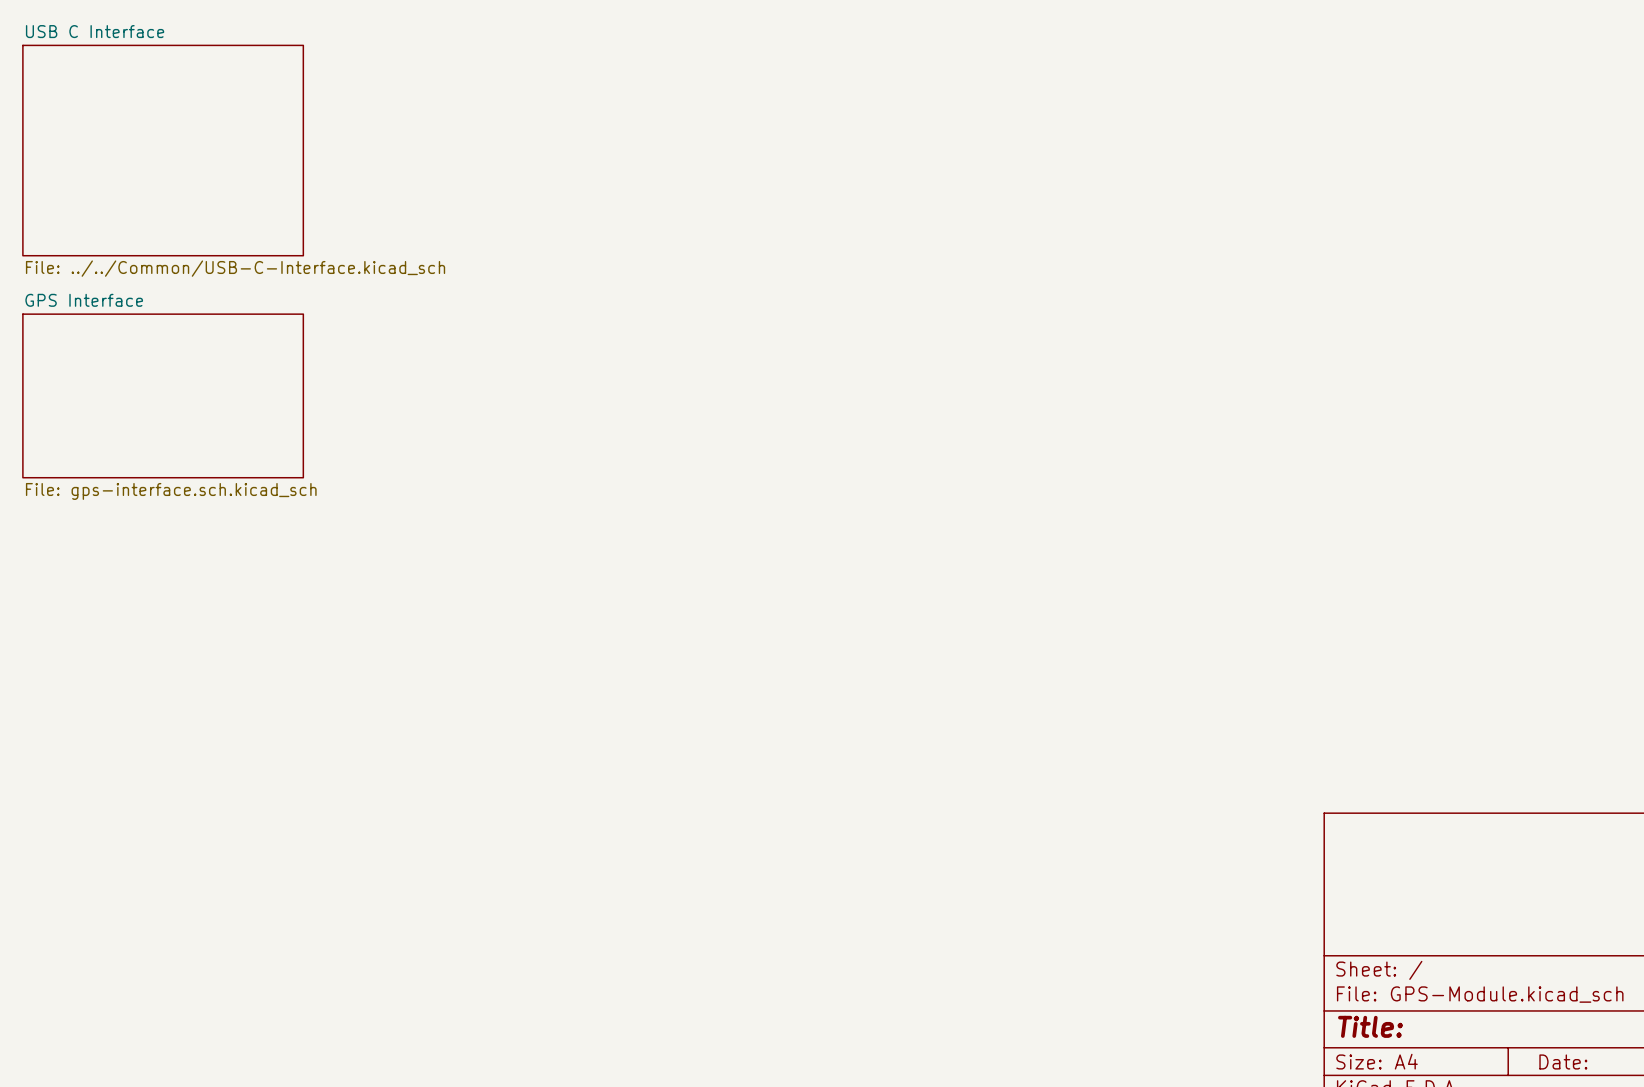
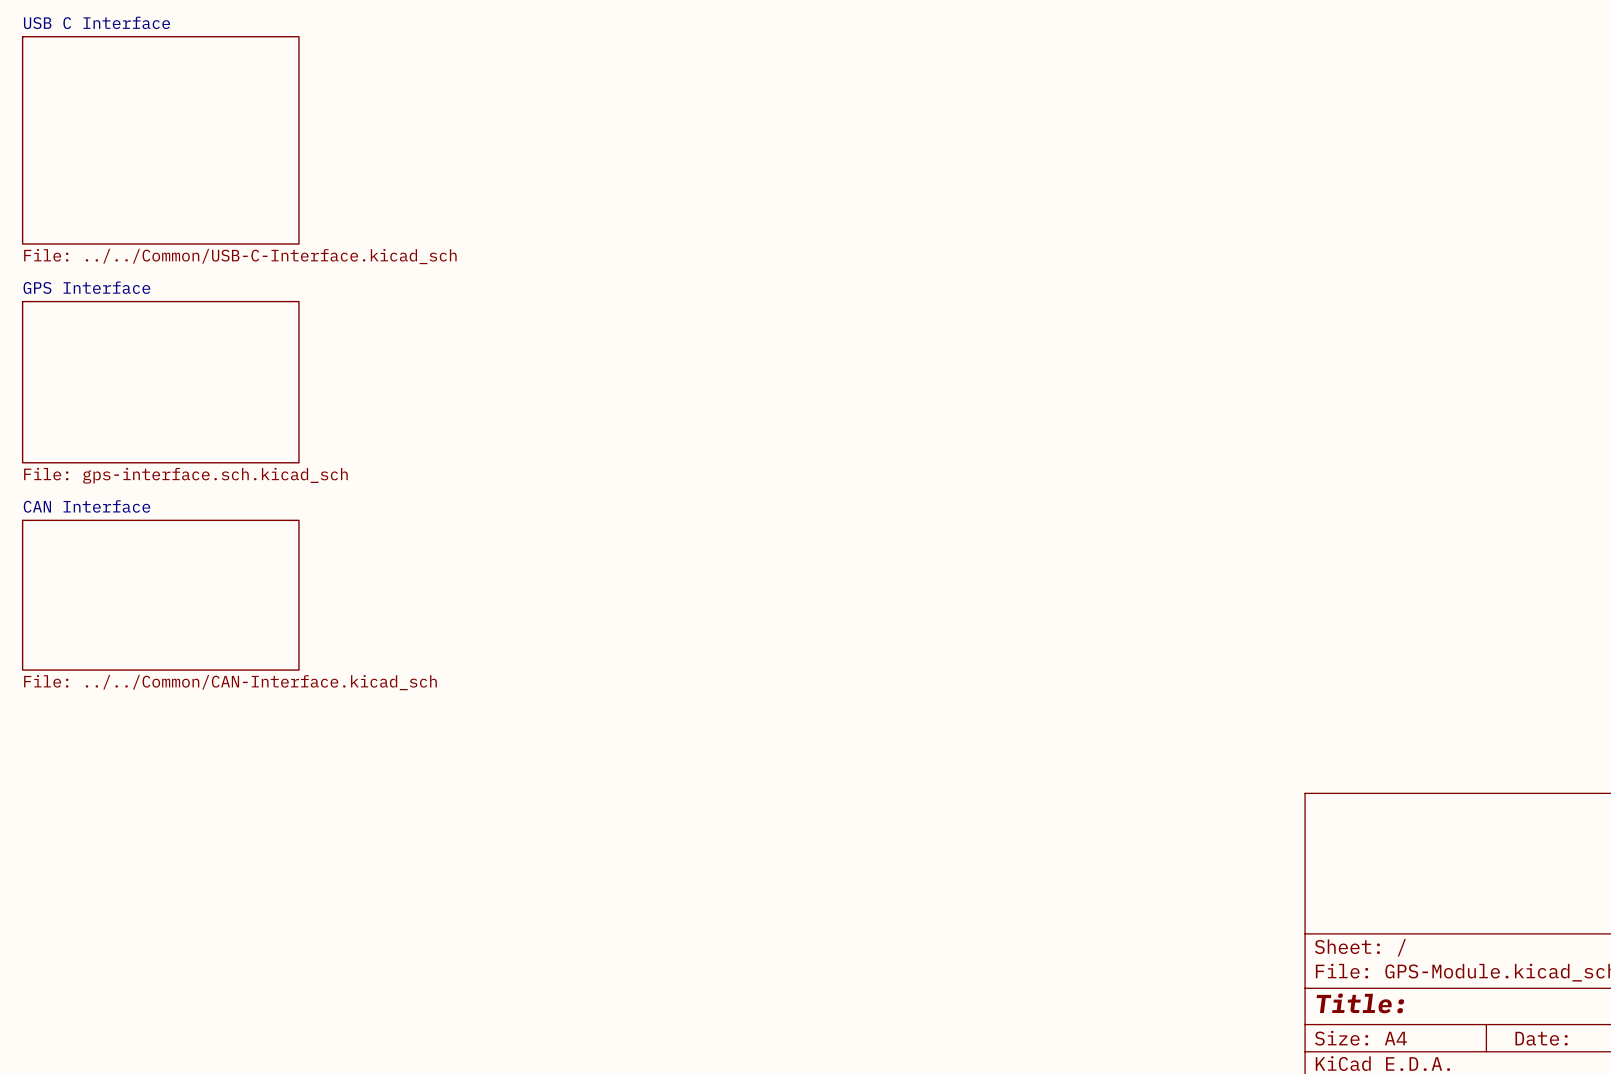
sheet CAN Interface: none -> File: ../../Common/CAN-Interface.kicad_sch (160, 595)

